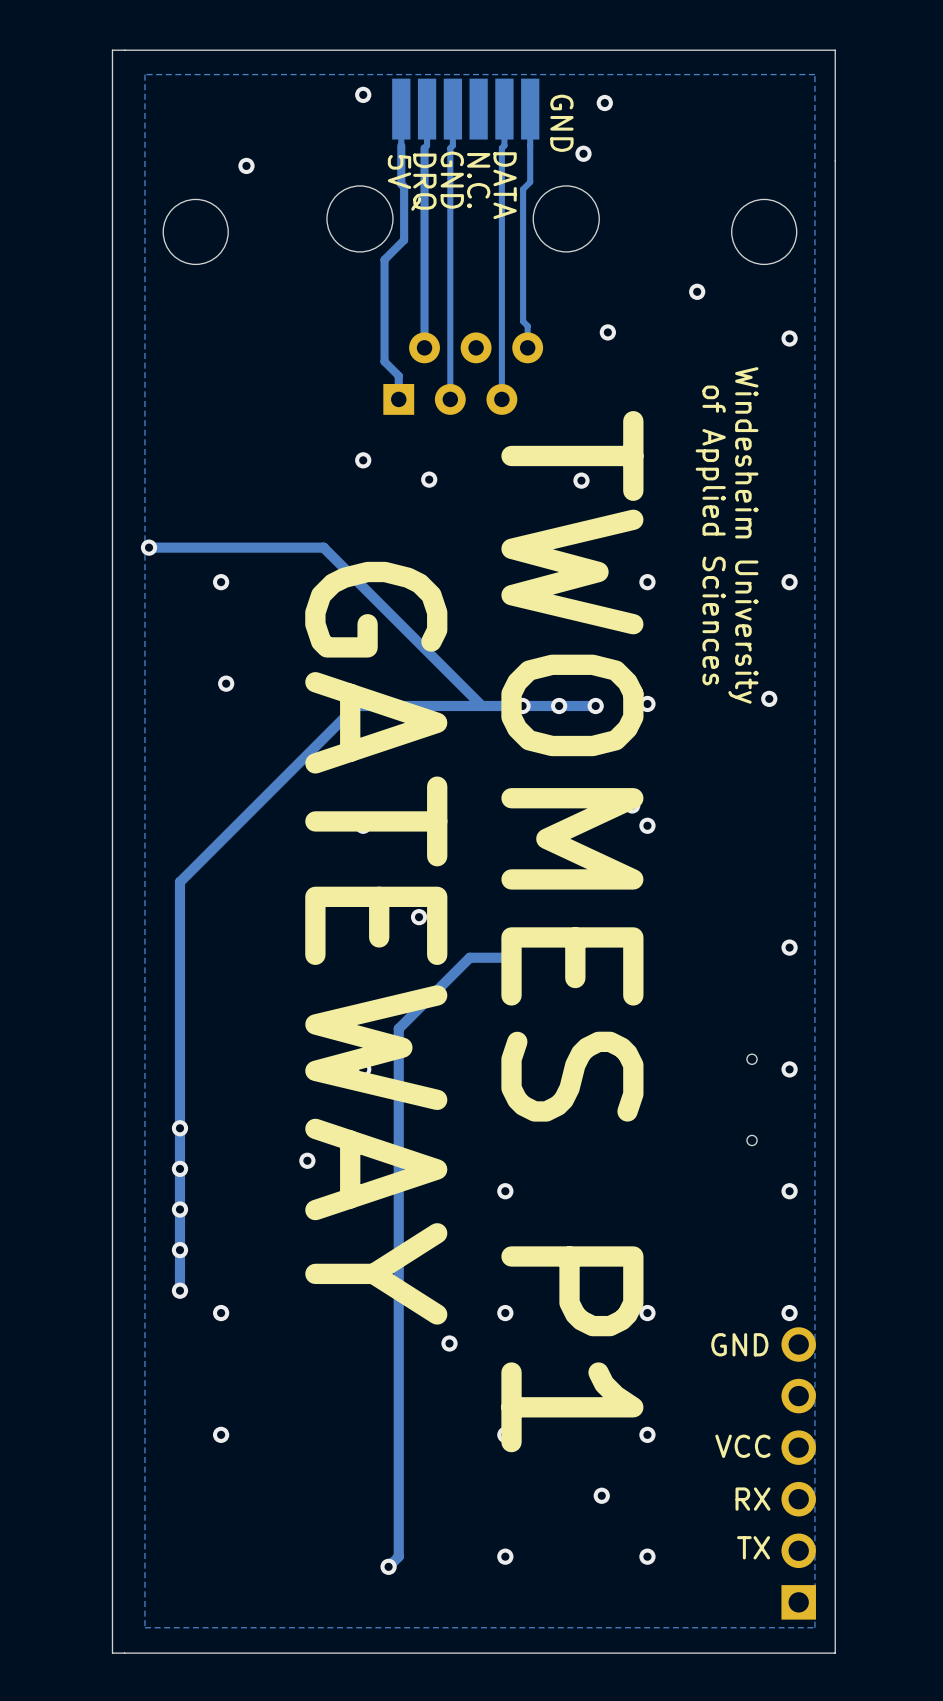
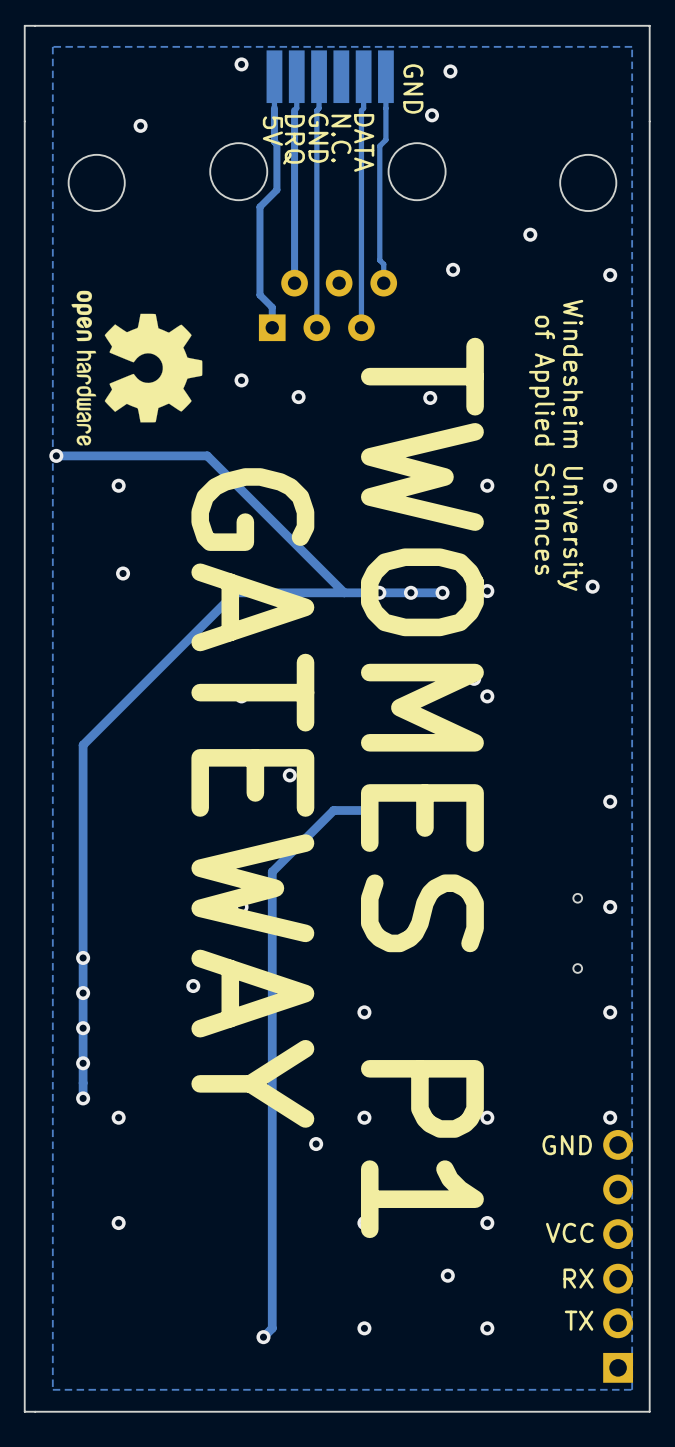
drawing: none -> [71, 290, 203, 446]

